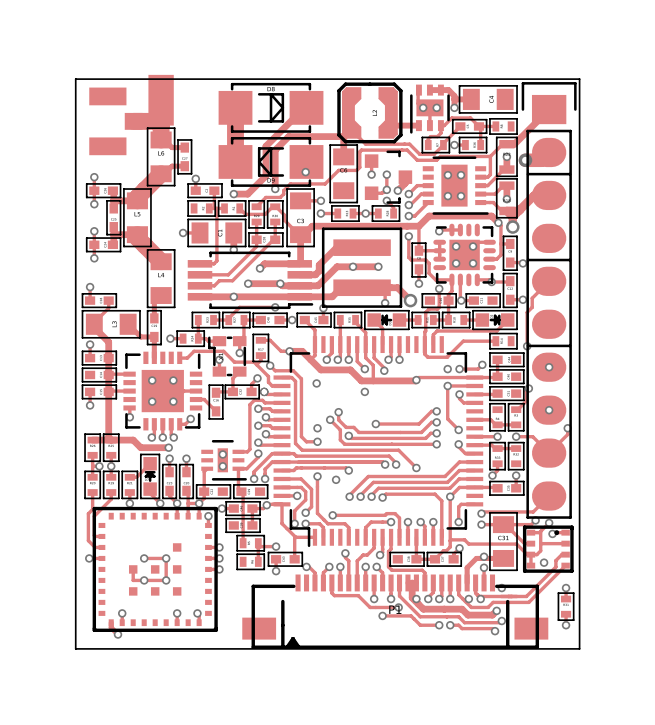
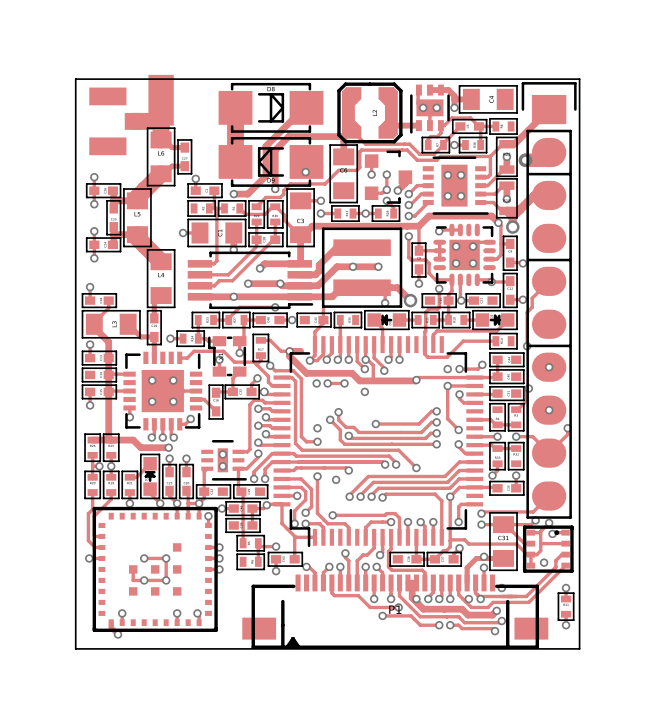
via: (323, 308) -> none
track: (304, 320) (314, 331) -> (323, 320) (323, 323) (314, 331)
track: (355, 322) (365, 332) (365, 344) -> none
track: none -> (323, 344) (323, 354) (317, 360) (309, 360)
track: (300, 351) (320, 369) (350, 369) (361, 380) -> (289, 351) (289, 356) (306, 373) (352, 373) (361, 380)
via: none -> (365, 359)
via: none -> (309, 360)
track: none -> (327, 383) (344, 383)
via: none -> (327, 383)
via: none -> (344, 383)

